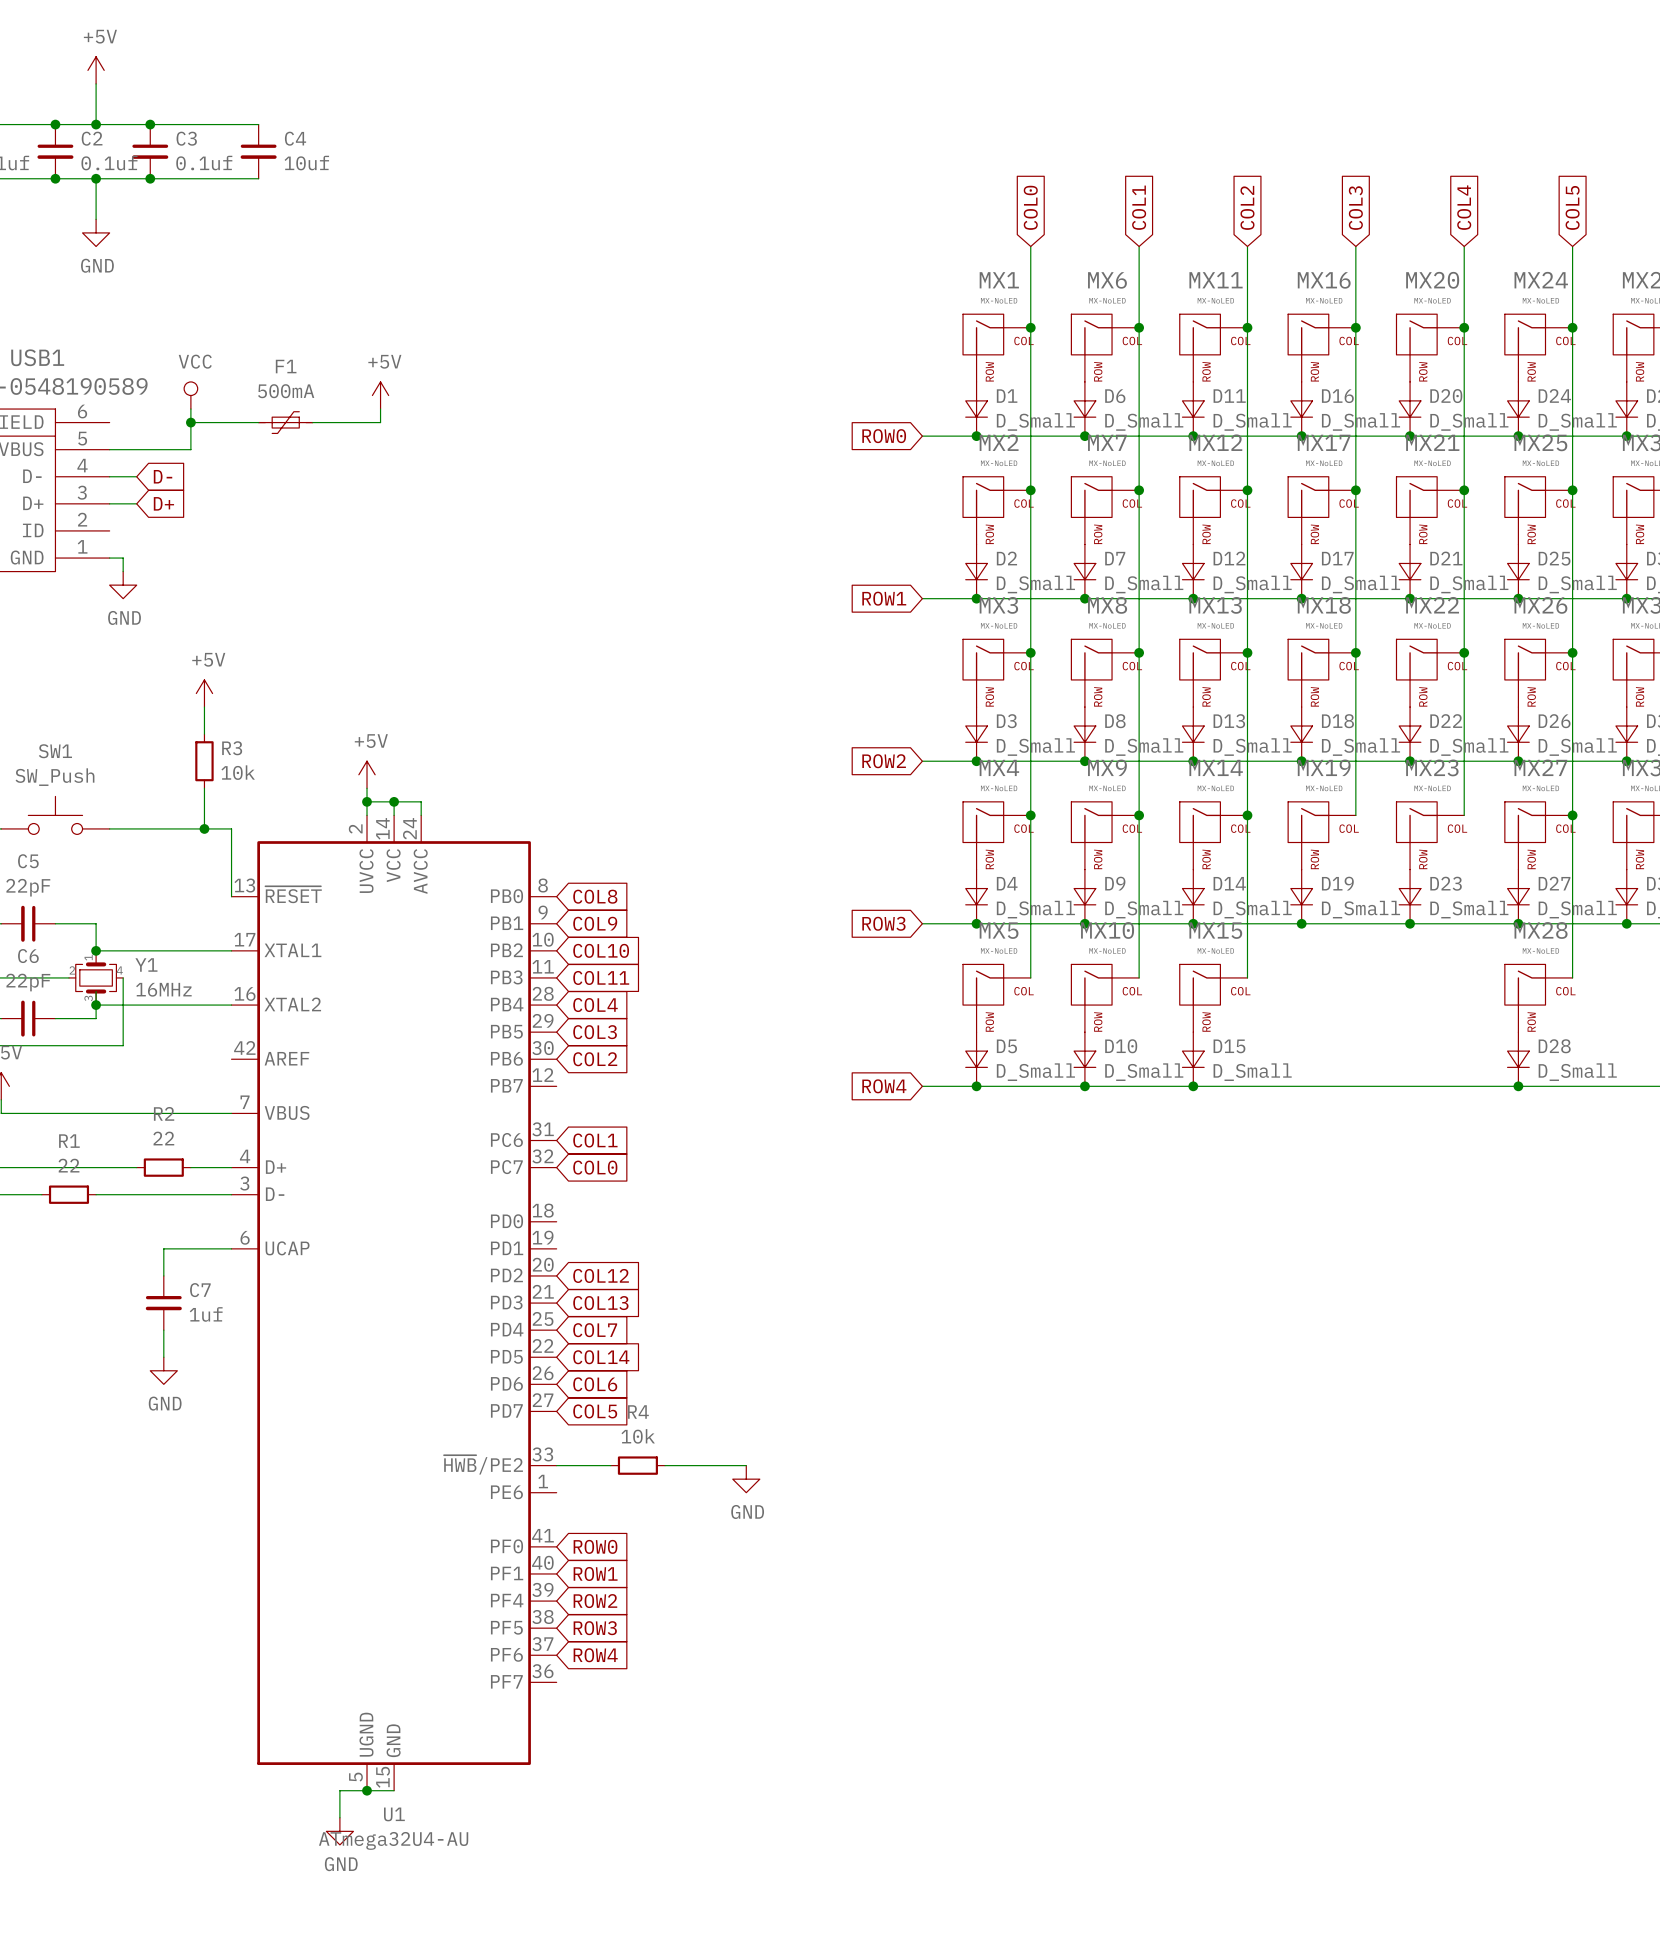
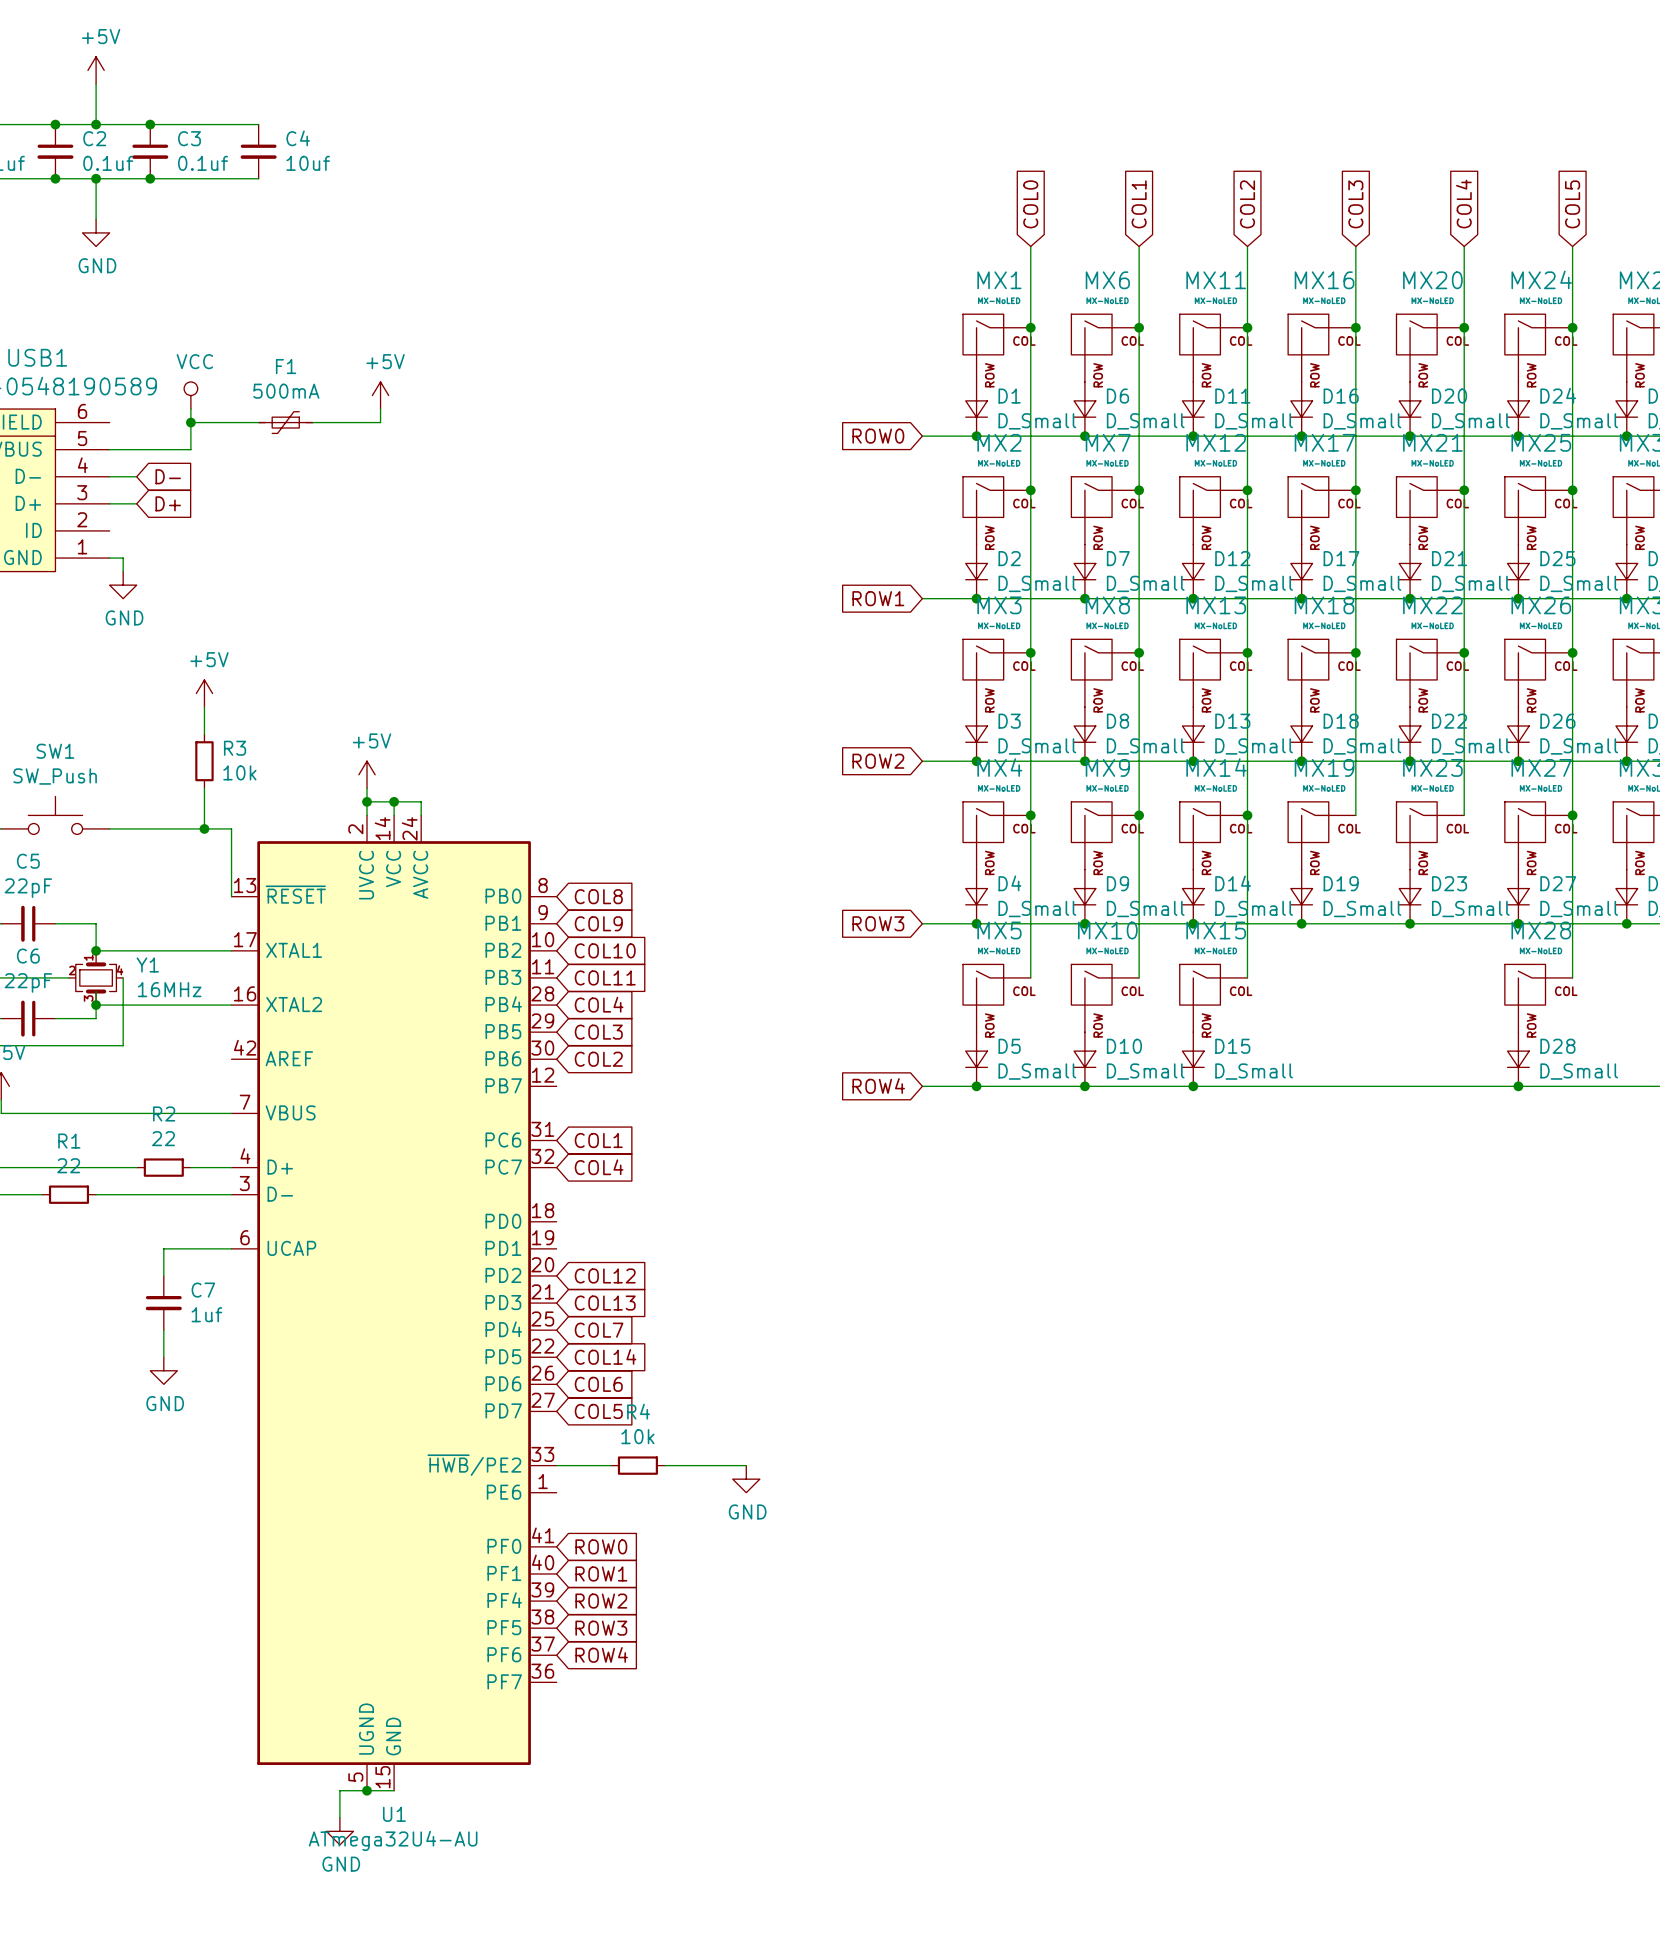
global label: COL0 (595, 1167) -> COL4 (599, 1167)

